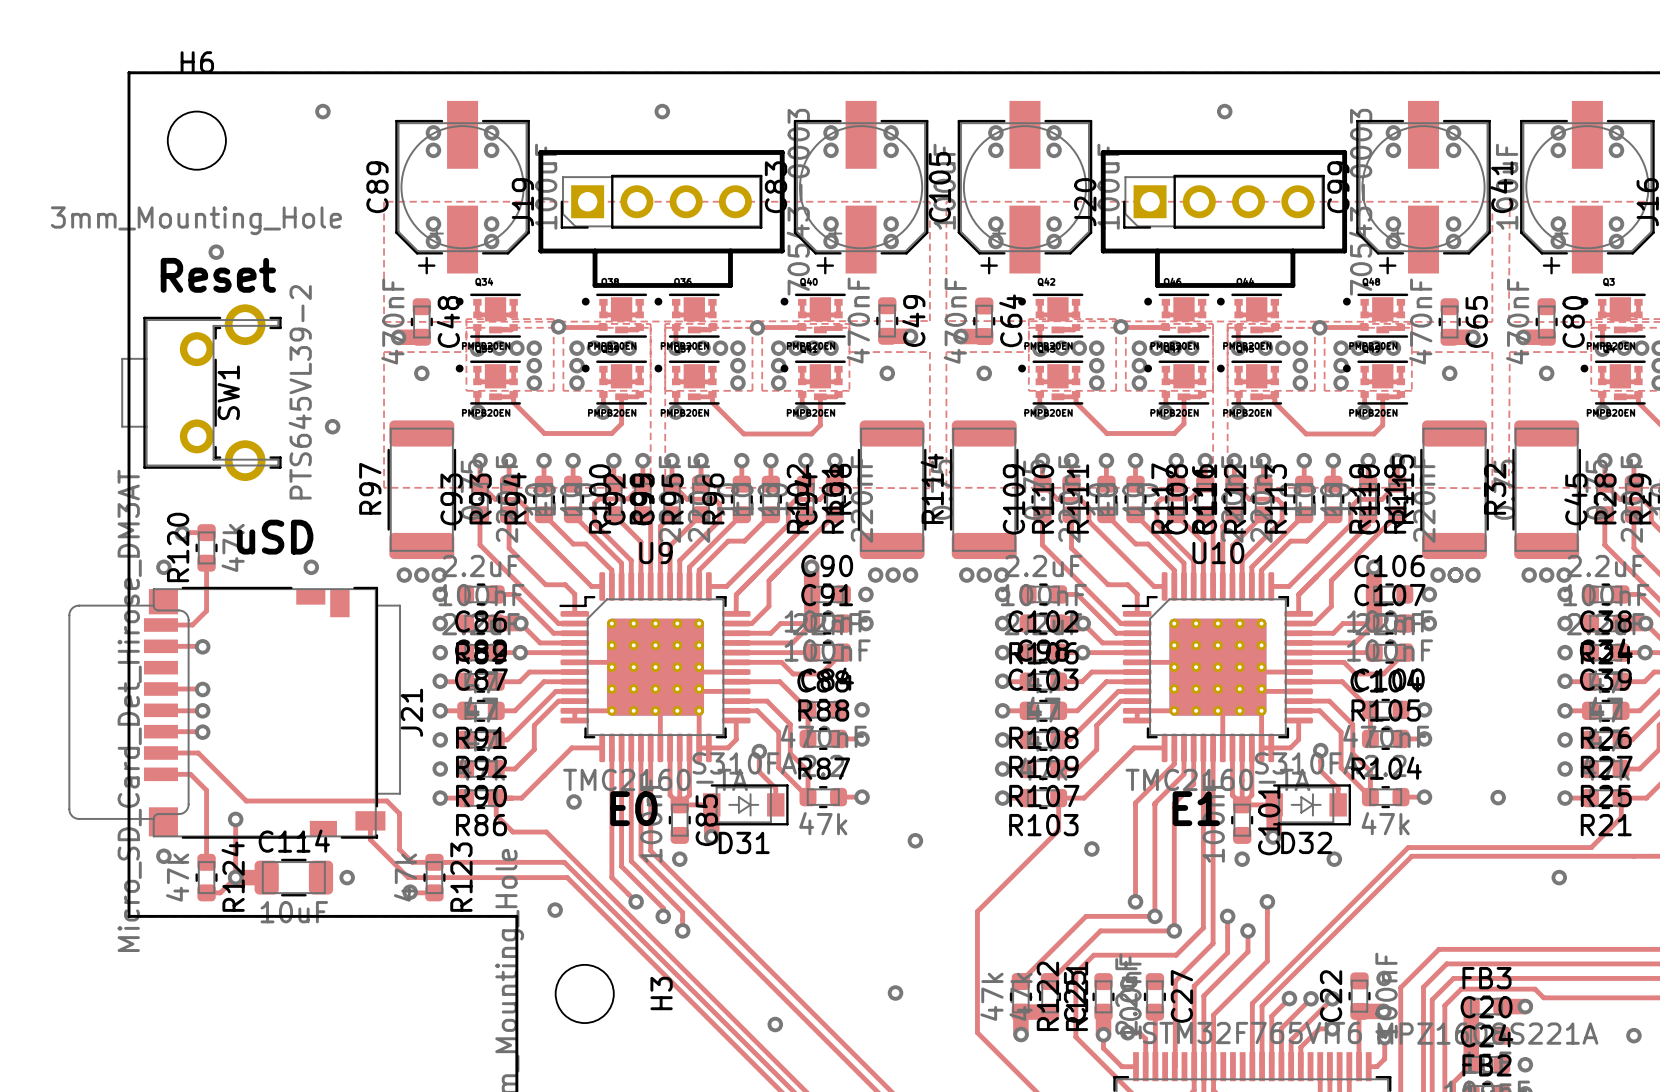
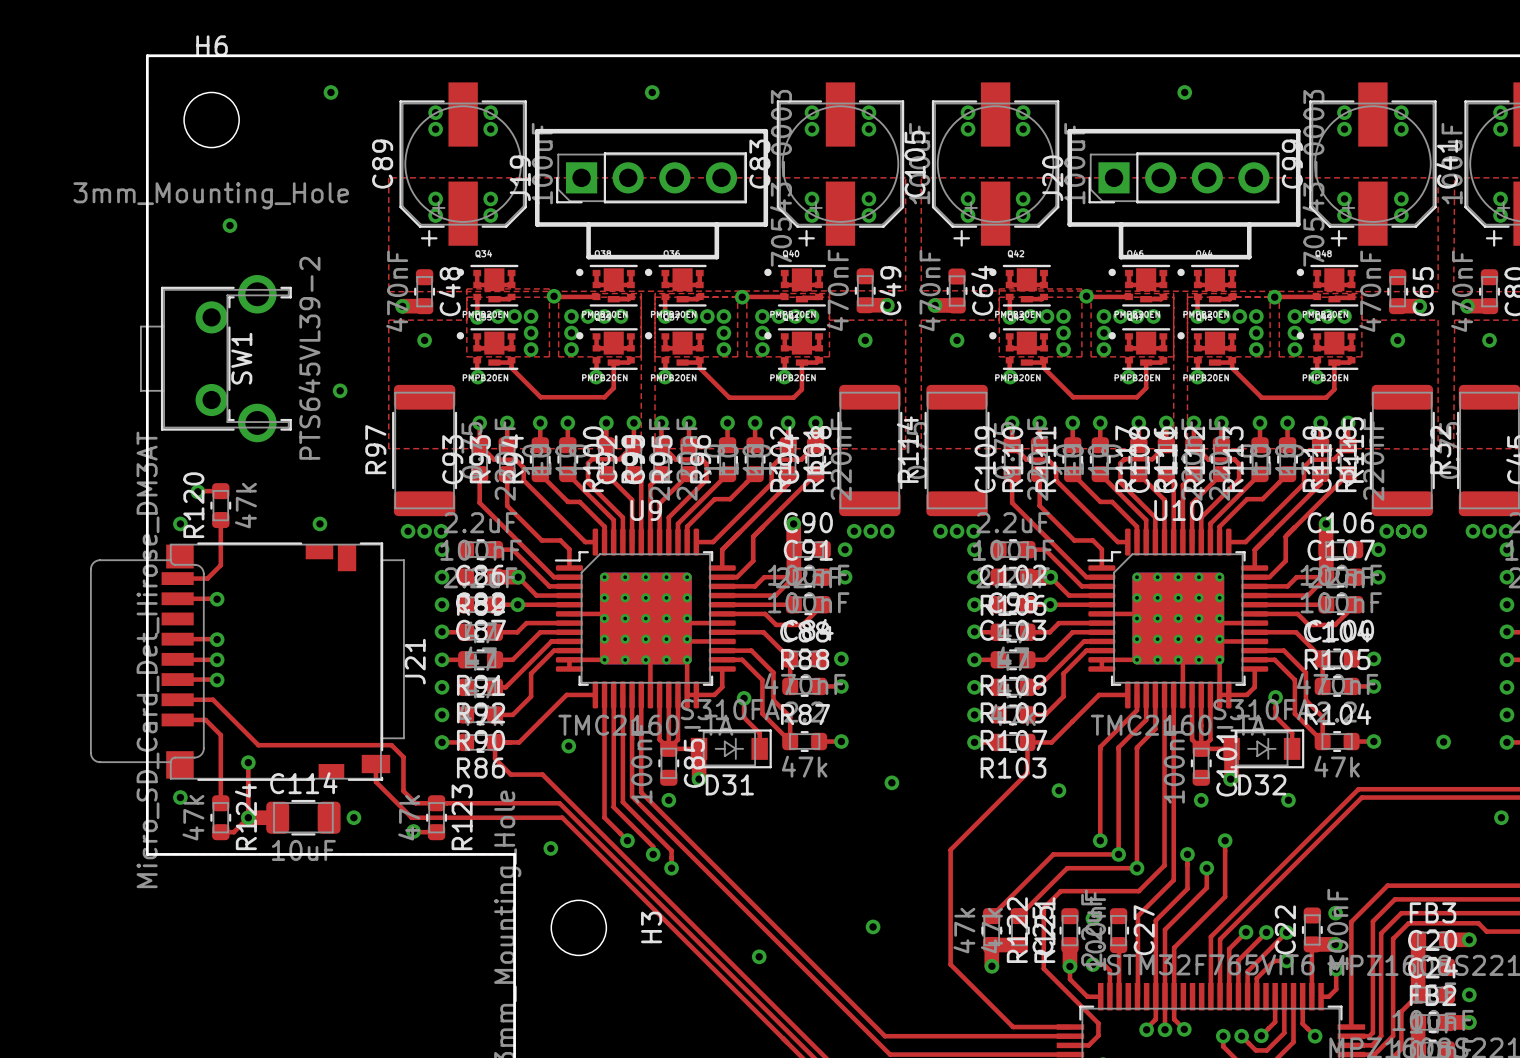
text: Reset (218, 275) -> none
text: uSD (275, 537) -> none
text: E0 (633, 808) -> none
text: E1 (1196, 808) -> none

